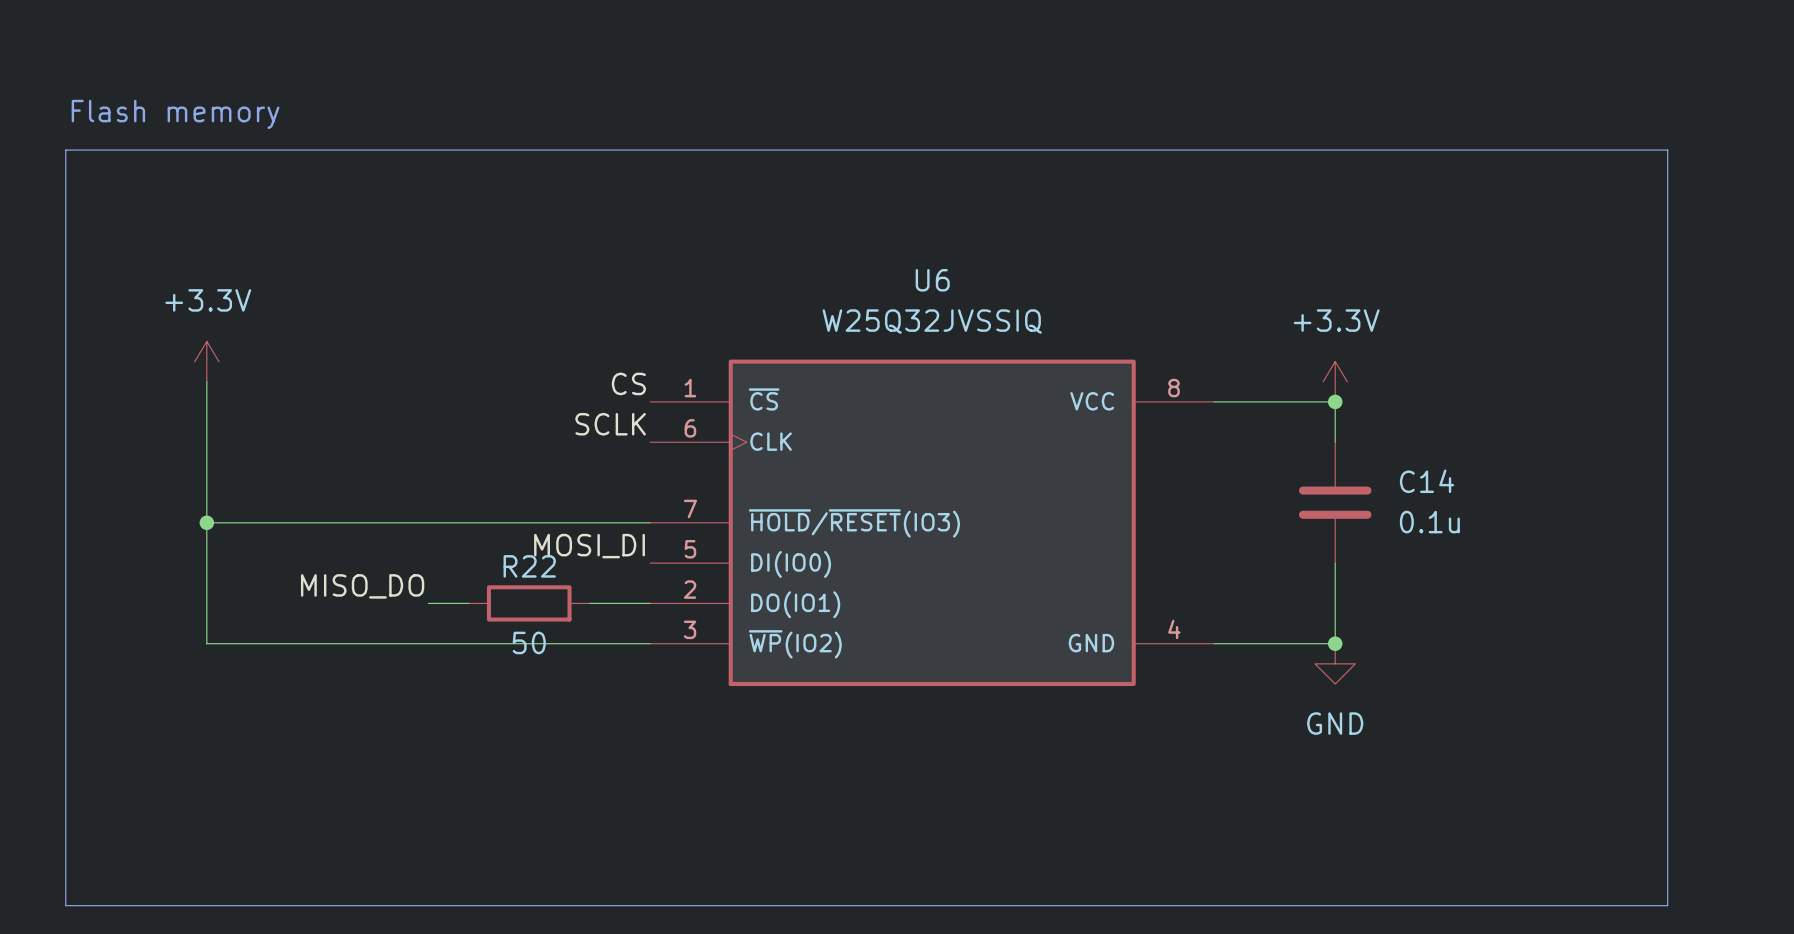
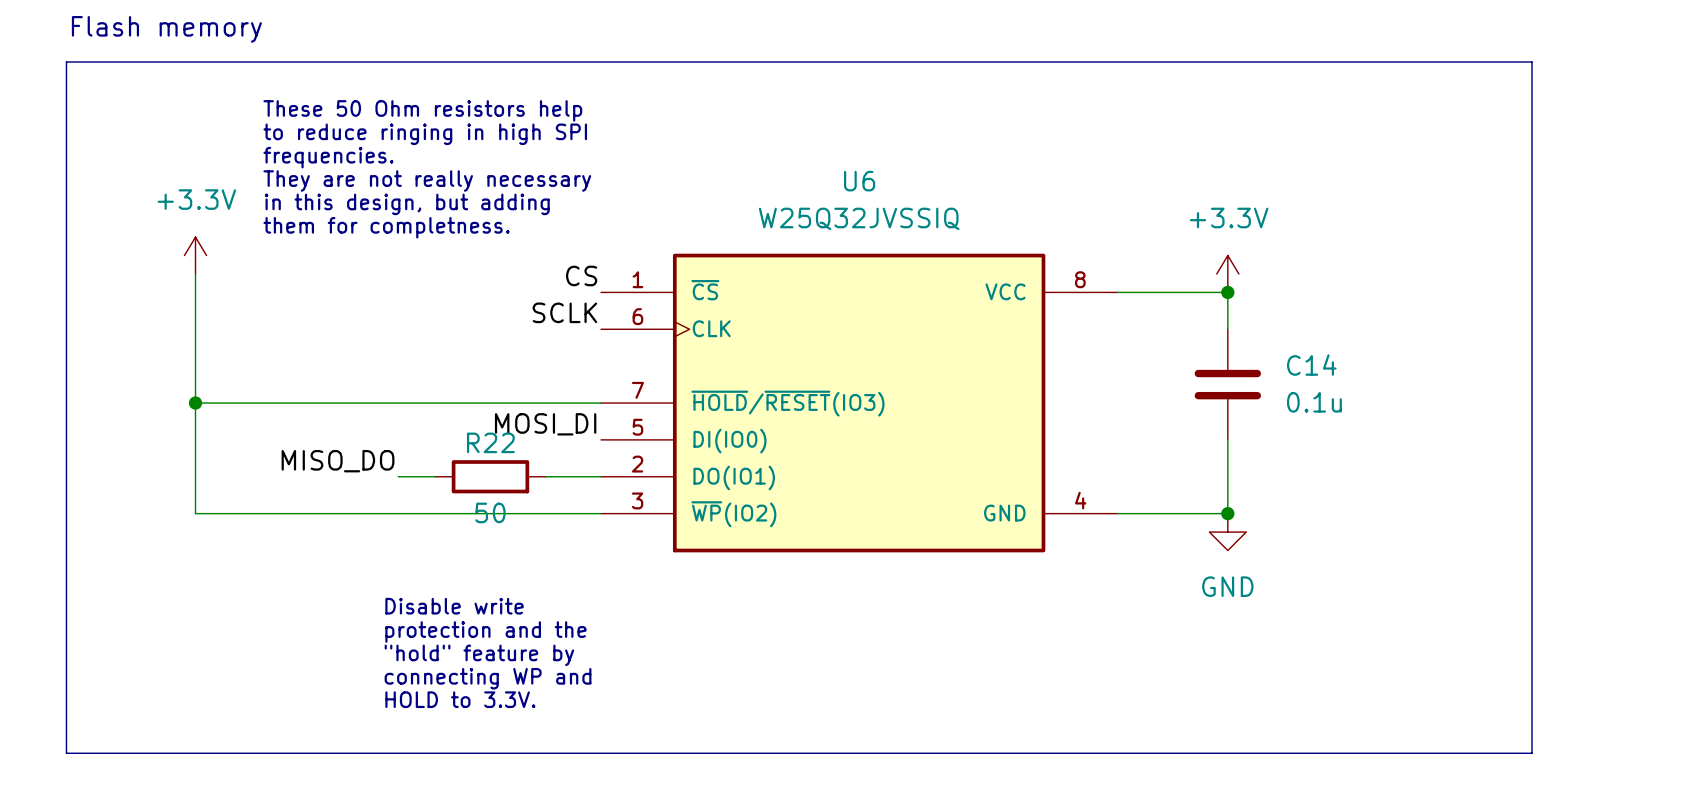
text: none -> These 50 Ohm resistors help (422, 110)
text: none -> to reduce ringing in high SPI (425, 134)
text: none -> frequencies. (328, 157)
text: none -> They are not really necessary (427, 181)
text: none -> in this design, but adding (407, 204)
text: none -> them for completness. (386, 227)
text: none -> Disable write (454, 606)
text: none -> protection and the (485, 631)
text: none -> "hold" feature by (479, 655)
text: none -> connecting WP and (488, 678)
text: none -> HOLD to 3.3V. (460, 699)

